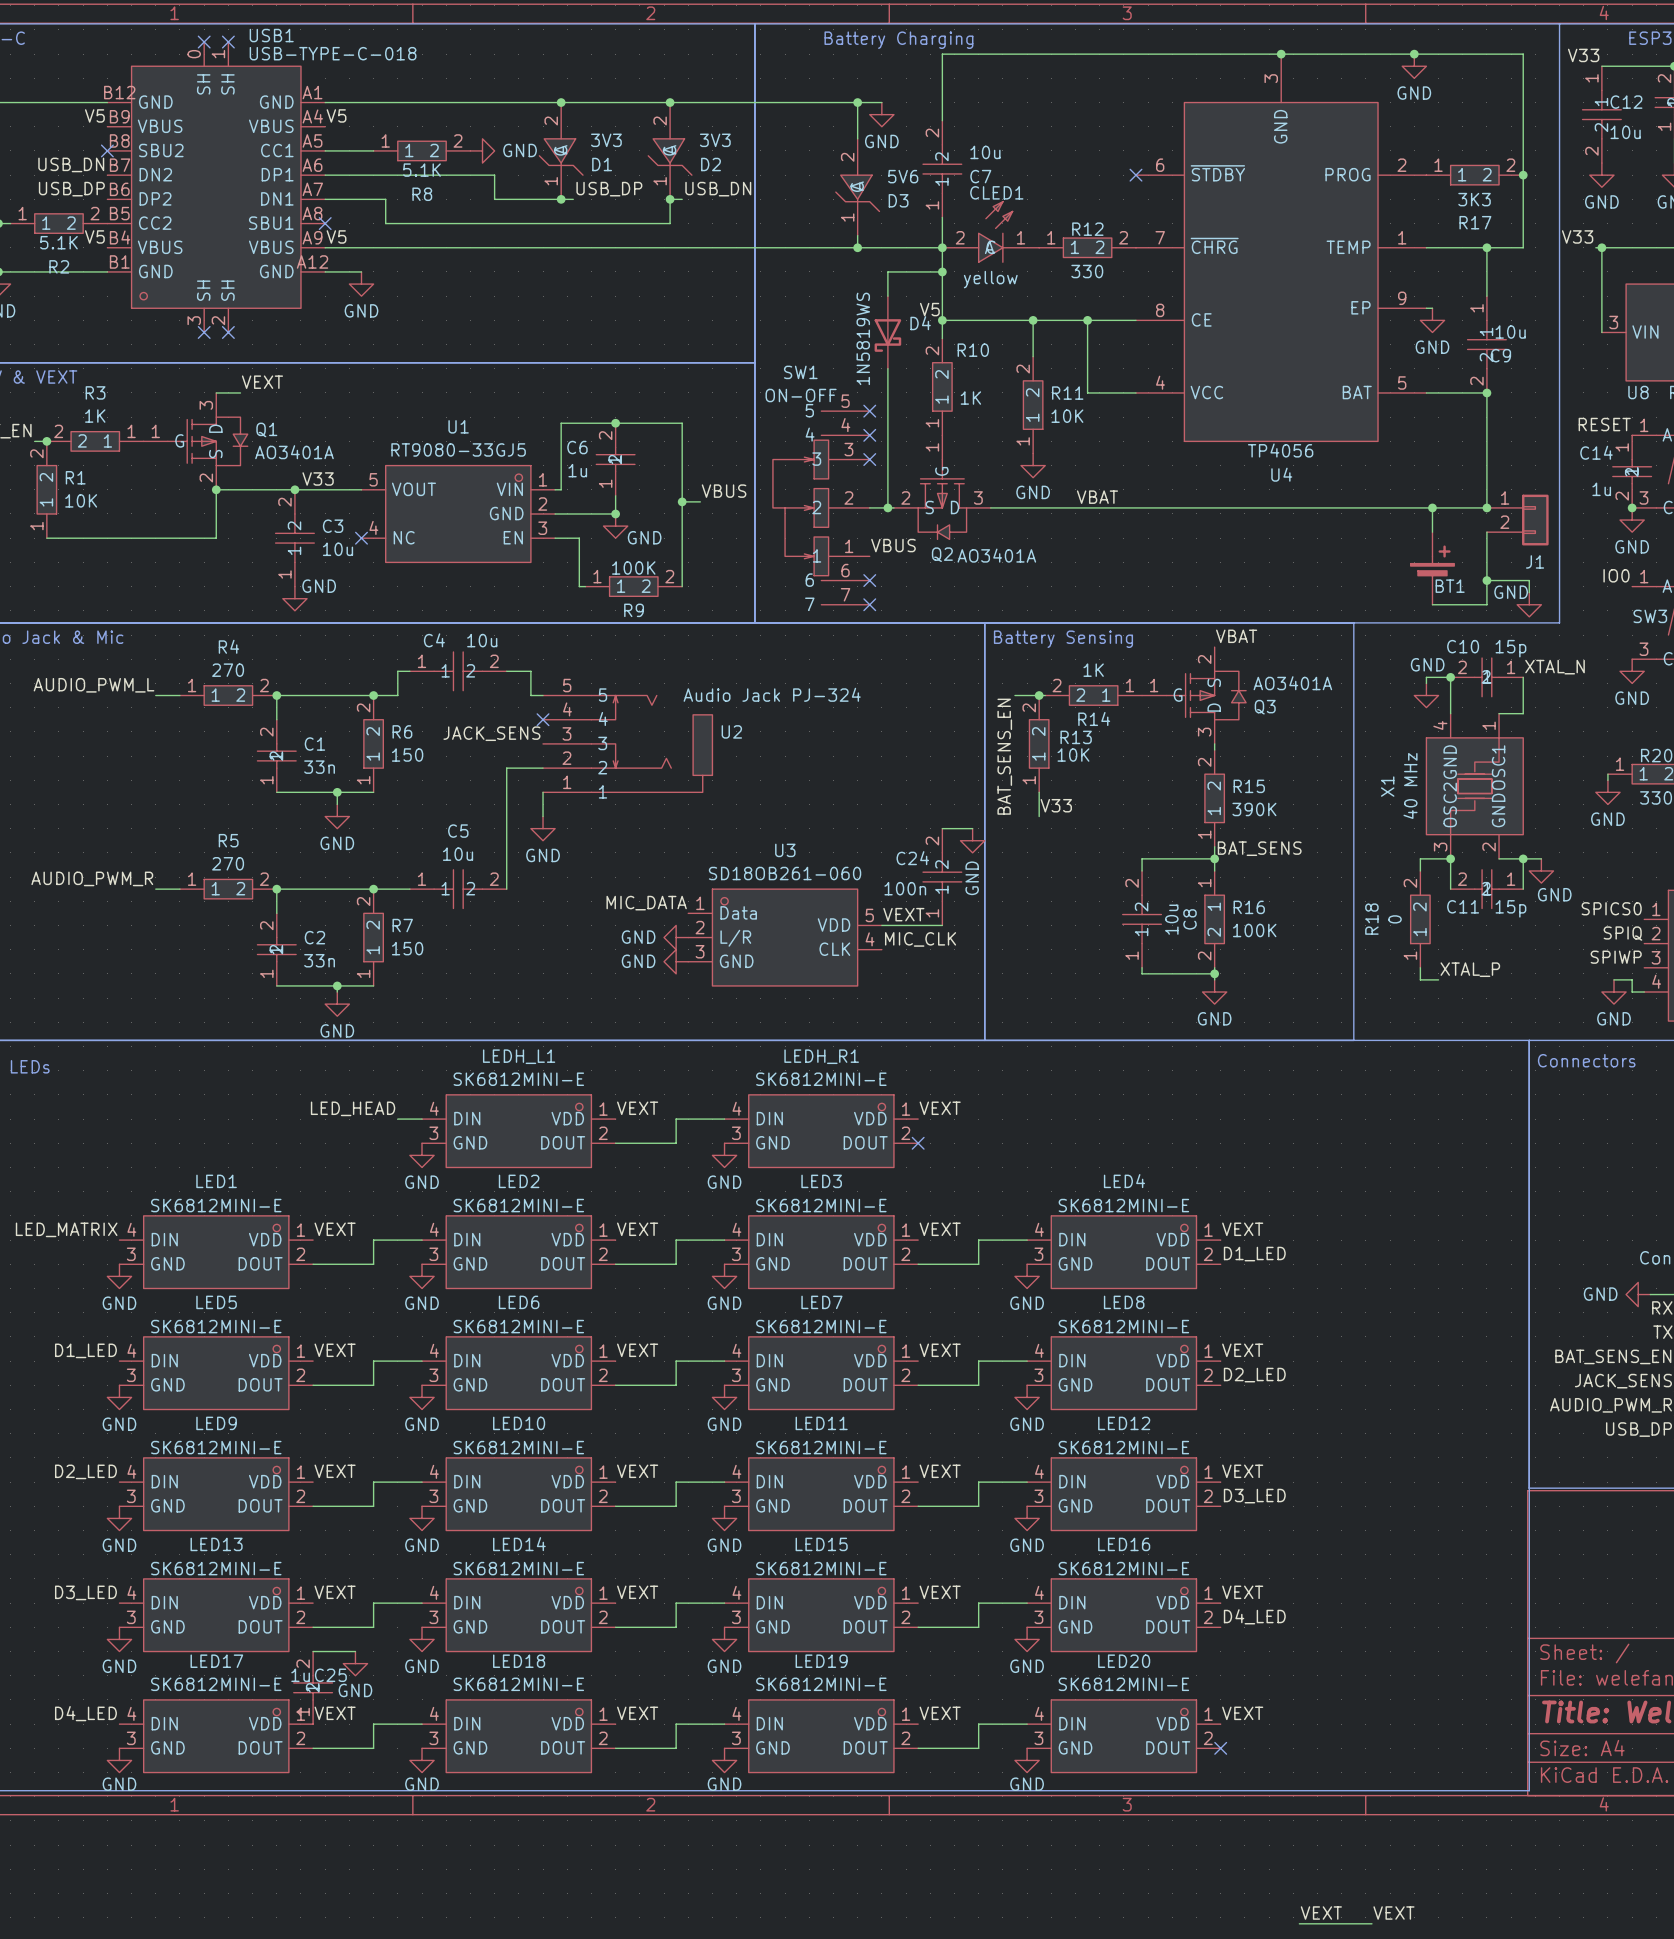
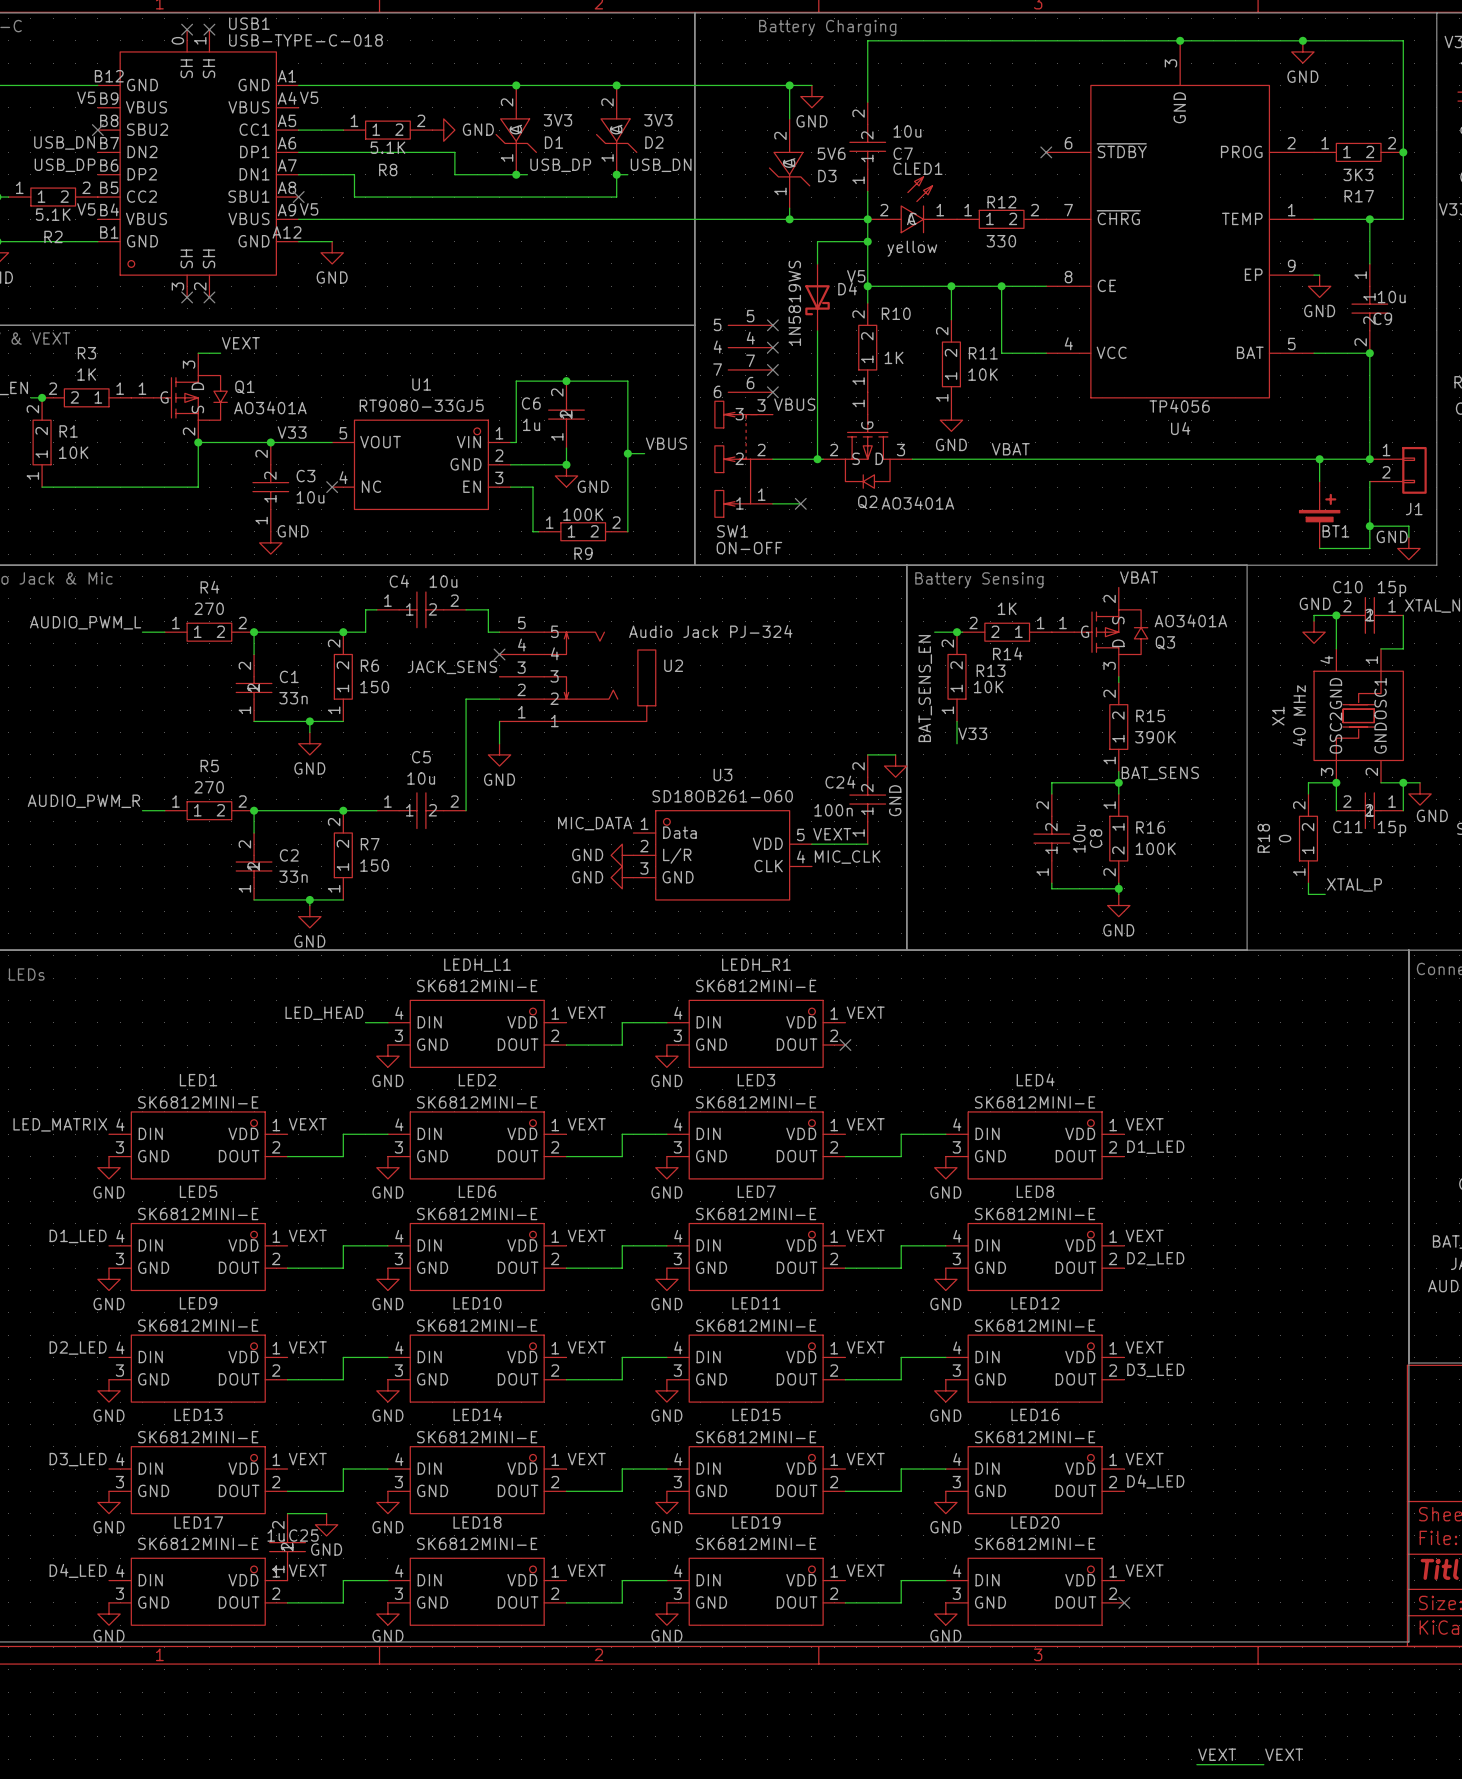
no-connect mark: none -> (772, 325)
SW1 name position: SW1 (800, 372) -> SW1 (732, 531)
no-connect mark: none -> (772, 347)
SW1 value position: ON-OFF (801, 395) -> ON-OFF (749, 548)
SW1 symbol: [772, 411, 870, 605] -> [714, 325, 773, 518]
no-connect mark: none -> (772, 369)
no-connect mark: (869, 411) -> none
no-connect mark: none -> (772, 392)
no-connect mark: (869, 435) -> none
no-connect mark: (869, 459) -> none
label position: VBUS (893, 545) -> VBUS (794, 404)
no-connect mark: none -> (800, 503)
no-connect mark: (869, 580) -> none
no-connect mark: (869, 604) -> none

